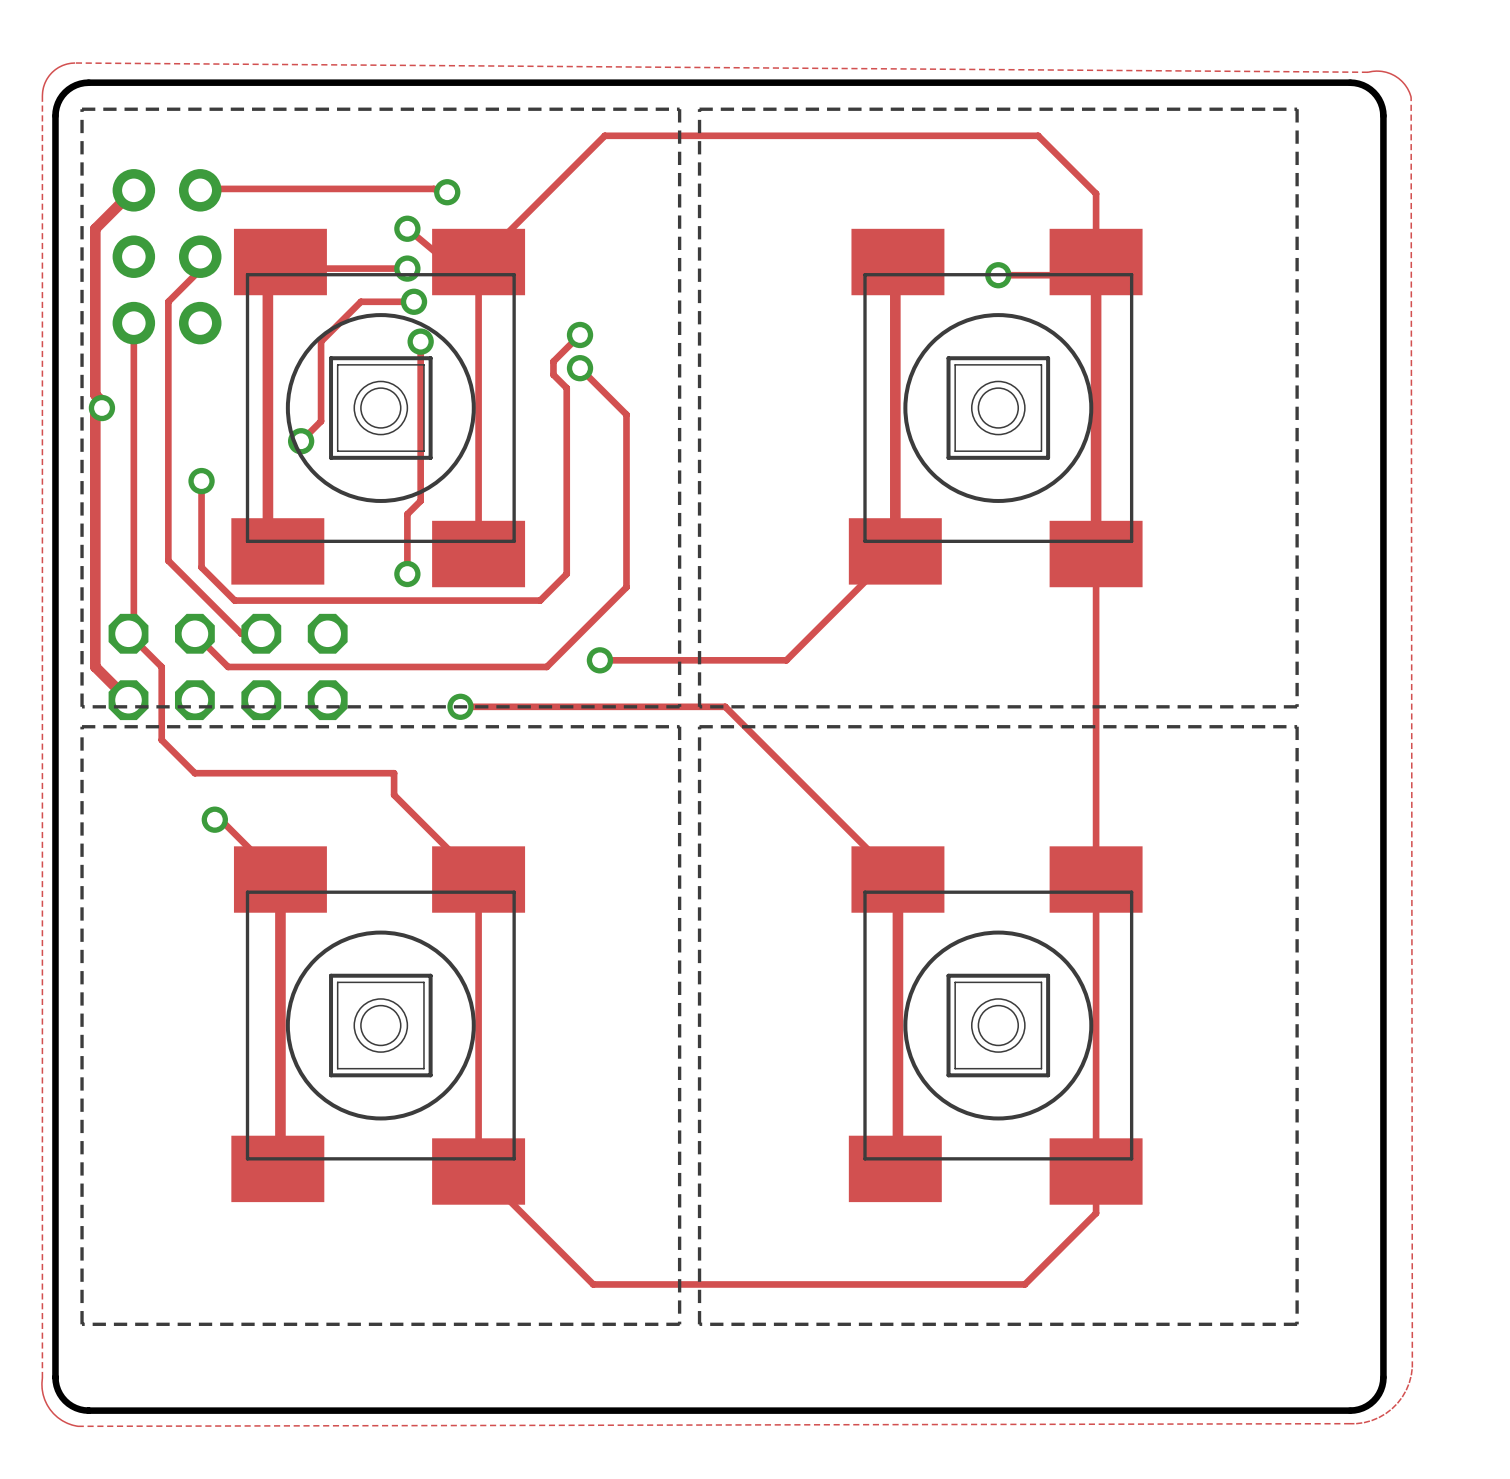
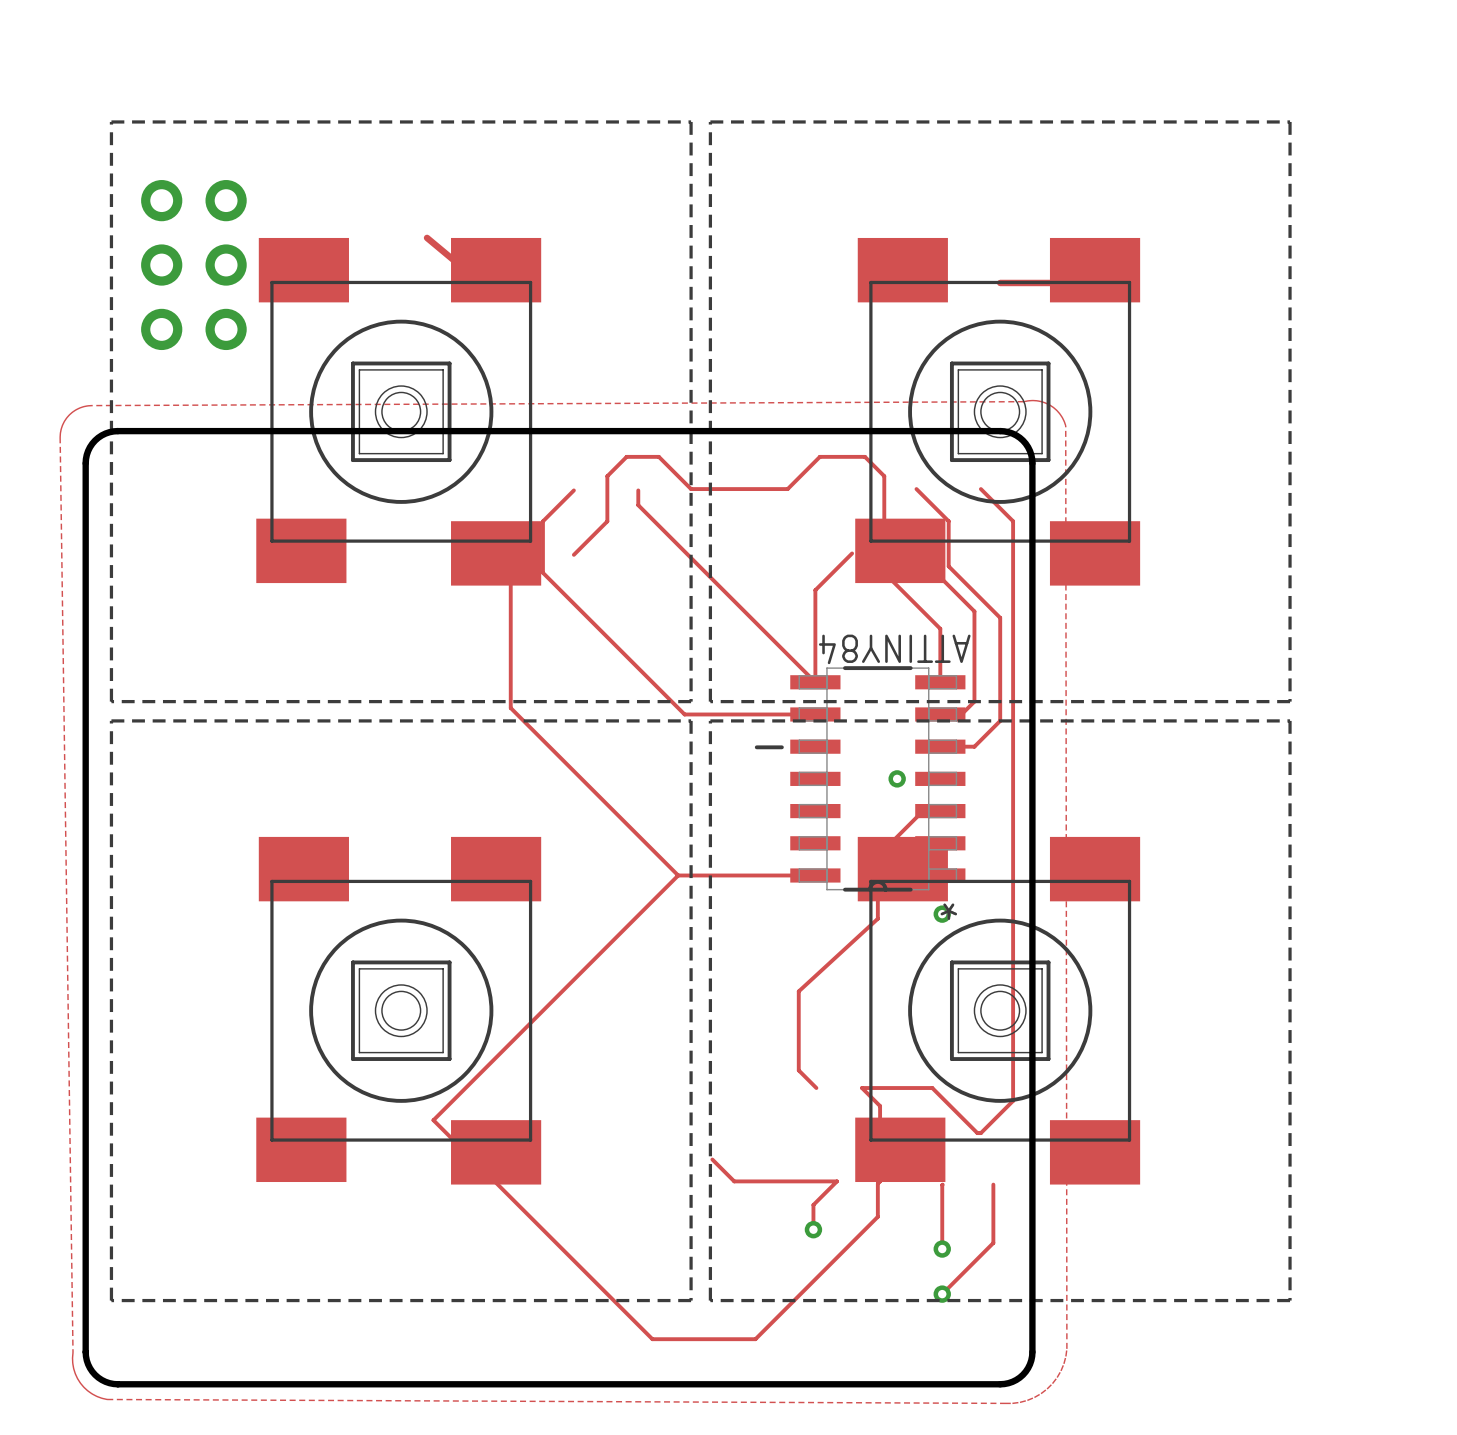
track: (133, 190) (95, 228) (95, 394) (101, 401) (101, 408) (95, 414) (95, 666) (128, 700) -> none
track: (200, 190) (433, 188) (447, 192) -> none
via: (447, 192) -> none
via: (407, 228) -> none
track: (200, 256) (206, 263) (168, 301) (168, 560) (241, 633) (261, 633) -> none
track: (897, 262) (895, 264) (895, 551) (786, 660) (599, 660) -> none
track: (407, 268) (287, 268) (280, 262) (267, 264) (267, 554) (270, 551) (277, 551) -> none
via: (407, 268) -> none
via: (998, 275) -> none
track: (414, 301) (360, 301) (321, 341) (321, 421) (301, 441) -> none
via: (414, 301) -> none
track: (133, 323) (133, 628) (128, 633) (161, 666) (161, 740) (194, 773) (394, 773) (394, 795) (478, 879) (478, 1171) -> none
track: (580, 334) (553, 361) (553, 374) (566, 388) (566, 574) (540, 600) (234, 600) (201, 567) (201, 481) -> none
via: (580, 334) -> none
track: (420, 341) (420, 500) (407, 514) (407, 574) -> none
via: (420, 341) -> none
track: (580, 368) (626, 414) (626, 587) (546, 666) (228, 666) (194, 633) -> none
via: (580, 368) -> none
via: (101, 408) -> none
via: (301, 441) -> none
board edge: (55, 461) (55, 115) (56, 107) (62, 95) (72, 87) (80, 83) (1350, 82) (1362, 85) (1373, 92) (1380, 103) (1383, 115) (1382, 1386) (1378, 1394) (1370, 1403) (1358, 1409) (1350, 1410) (998, 1410) -> (85, 463) (88, 450) (95, 440) (105, 433) (117, 431) (1000, 431) (1012, 433) (1022, 440) (1029, 450) (1032, 463) (1032, 1352) (1029, 1364) (1022, 1374) (1012, 1381) (1000, 1384)
via: (201, 481) -> none
track: none -> (916, 489) (948, 521) (948, 566) (1000, 617) (1000, 720) (974, 746) (940, 746)
track: none -> (980, 489) (1013, 521) (1013, 1100) (980, 1133) (977, 1133) (932, 1088) (862, 1088) (880, 1106) (880, 1181) (877, 1183) (877, 1216) (755, 1339) (652, 1339) (433, 1120) (678, 875)
track: none -> (573, 490) (542, 521) (542, 572) (684, 714) (815, 714)
track: none -> (638, 490) (638, 505) (815, 682) (815, 590) (852, 553)
track: none -> (916, 553) (974, 611) (974, 701) (961, 714) (940, 714)
track: none -> (509, 554) (510, 708) (678, 875)
track: none -> (573, 554) (607, 521) (607, 476) (626, 456) (658, 456) (691, 489) (787, 489) (819, 456) (864, 456) (884, 476) (884, 572) (940, 628) (940, 682)
track: (473, 558) (478, 554) (478, 262) (604, 135) (1038, 135) (1096, 193) (1096, 1213) (1024, 1284) (593, 1284) (480, 1171) (480, 1164) -> none
via: (407, 574) -> none
via: (599, 660) -> none
part: (228, 666) -> none
track: (460, 706) (725, 706) (897, 879) (897, 1166) (895, 1168) -> none
via: (460, 706) -> none
ATTINY84: none -> (860, 778)
via: none -> (897, 778)
track: (214, 819) (220, 819) (280, 879) (280, 1166) (277, 1168) -> none
via: (214, 819) -> none
track: none -> (940, 811) (922, 811) (877, 856) (877, 918) (798, 991) (798, 1070) (816, 1088)
track: none -> (678, 875) (815, 875)
via: none -> (942, 914)
track: none -> (712, 1159) (734, 1181) (836, 1181) (813, 1204) (813, 1229)
track: none -> (942, 1184) (942, 1249)
track: none -> (993, 1184) (993, 1242) (942, 1294)
via: none -> (813, 1229)
via: none -> (942, 1249)
via: none -> (942, 1294)
zone outline: (42, 1377) (42, 95) (44, 83) (51, 72) (62, 65) (75, 63) (1377, 71) (1390, 73) (1402, 81) (1411, 97) (1412, 1367) (1406, 1390) (1397, 1403) (1378, 1417) (1356, 1423) (77, 1426) -> (73, 1352) (60, 437) (62, 425) (69, 414) (79, 408) (91, 405) (1032, 400) (1045, 403) (1056, 410) (1065, 425) (1066, 1348) (1061, 1370) (1052, 1383) (1034, 1397) (1012, 1403) (107, 1399)

